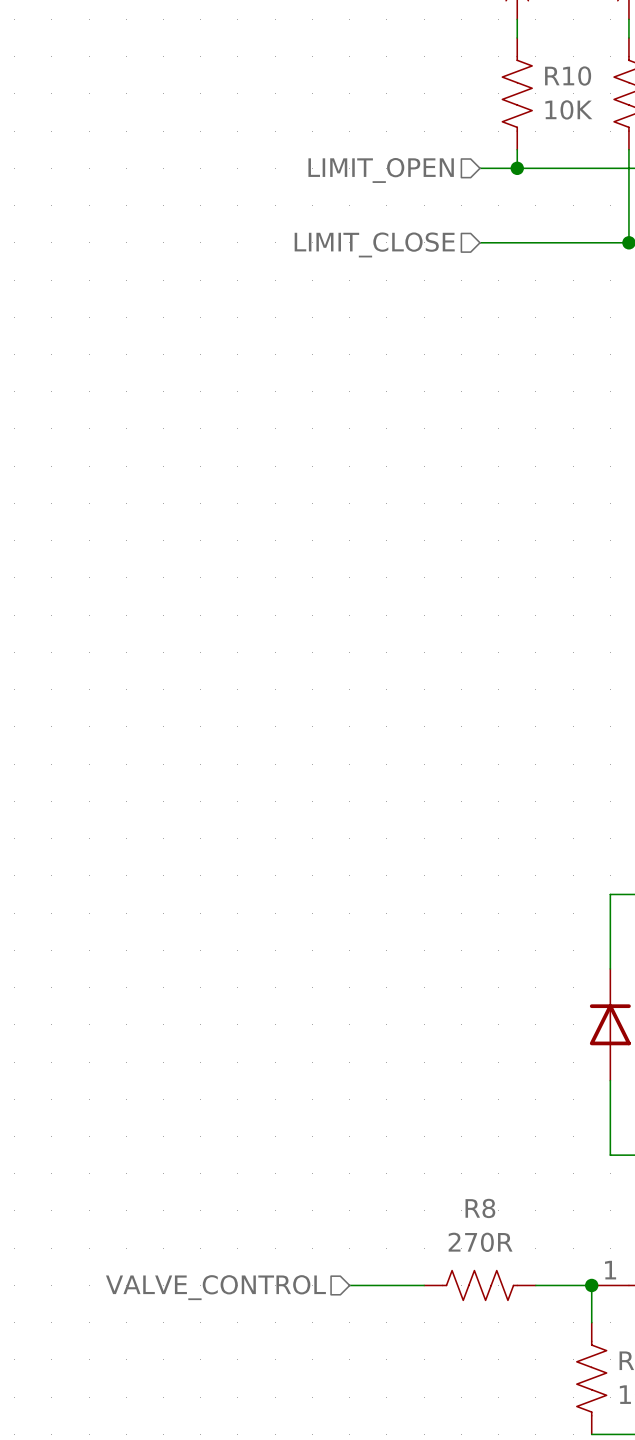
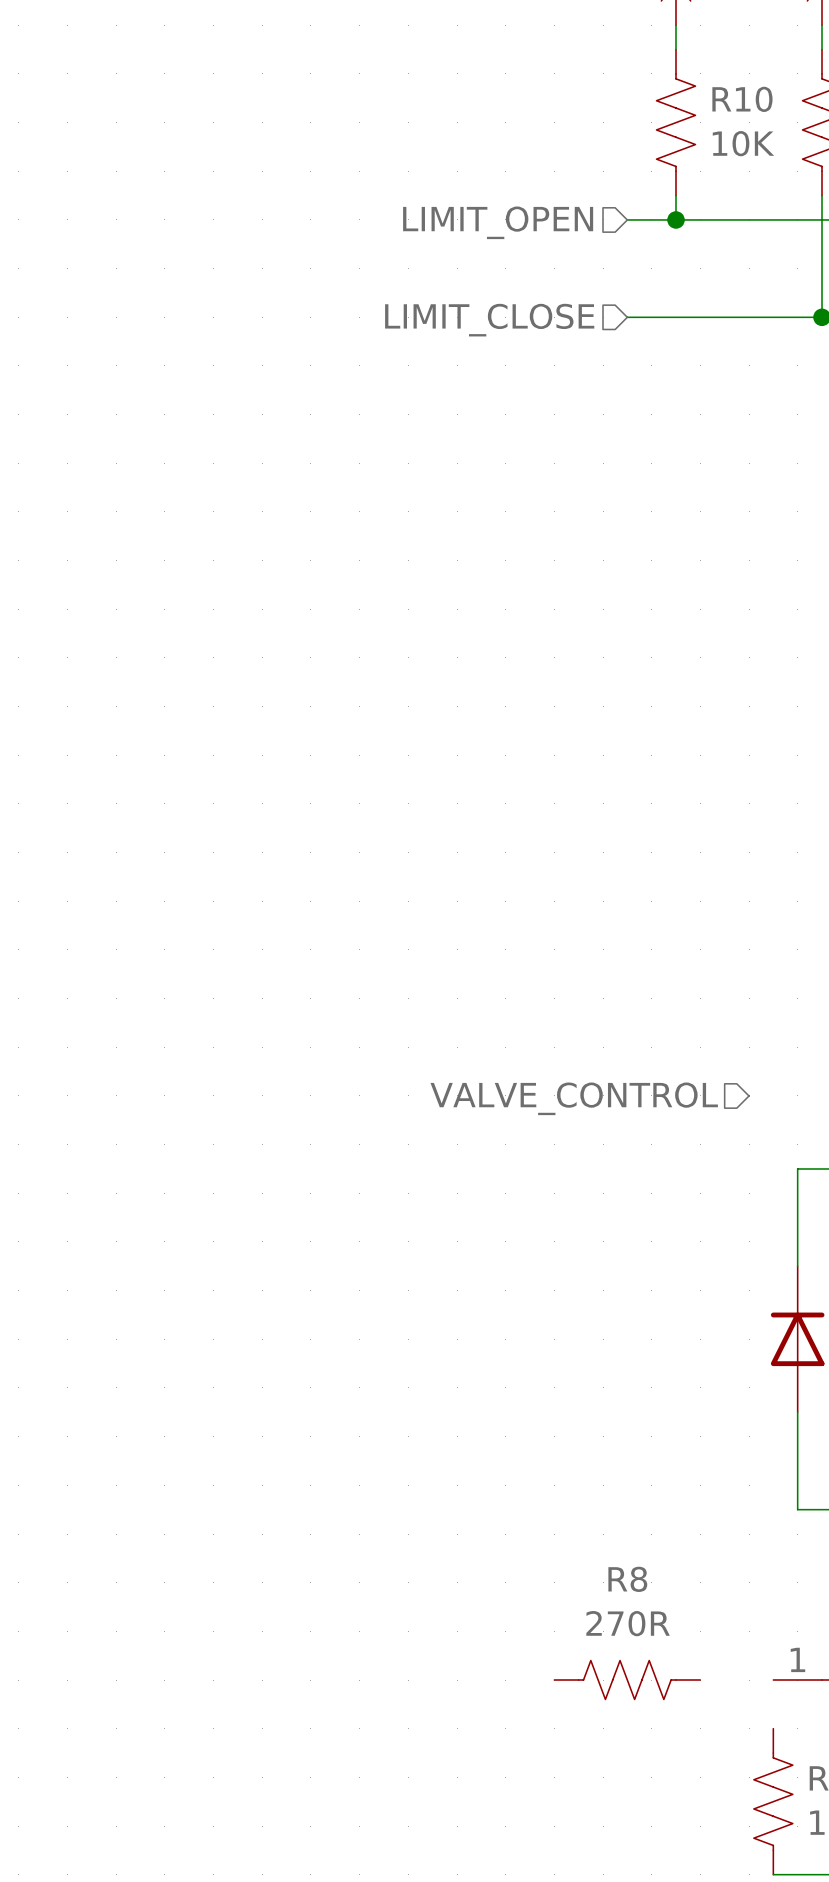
hierarchical label: none -> VALVE_CONTROL (574, 1098)
wire: (349, 1285) (424, 1285) -> none
wire: (535, 1285) (591, 1285) (591, 1322) -> none
junction: (591, 1285) -> none
hierarchical label: VALVE_CONTROL (215, 1287) -> none

